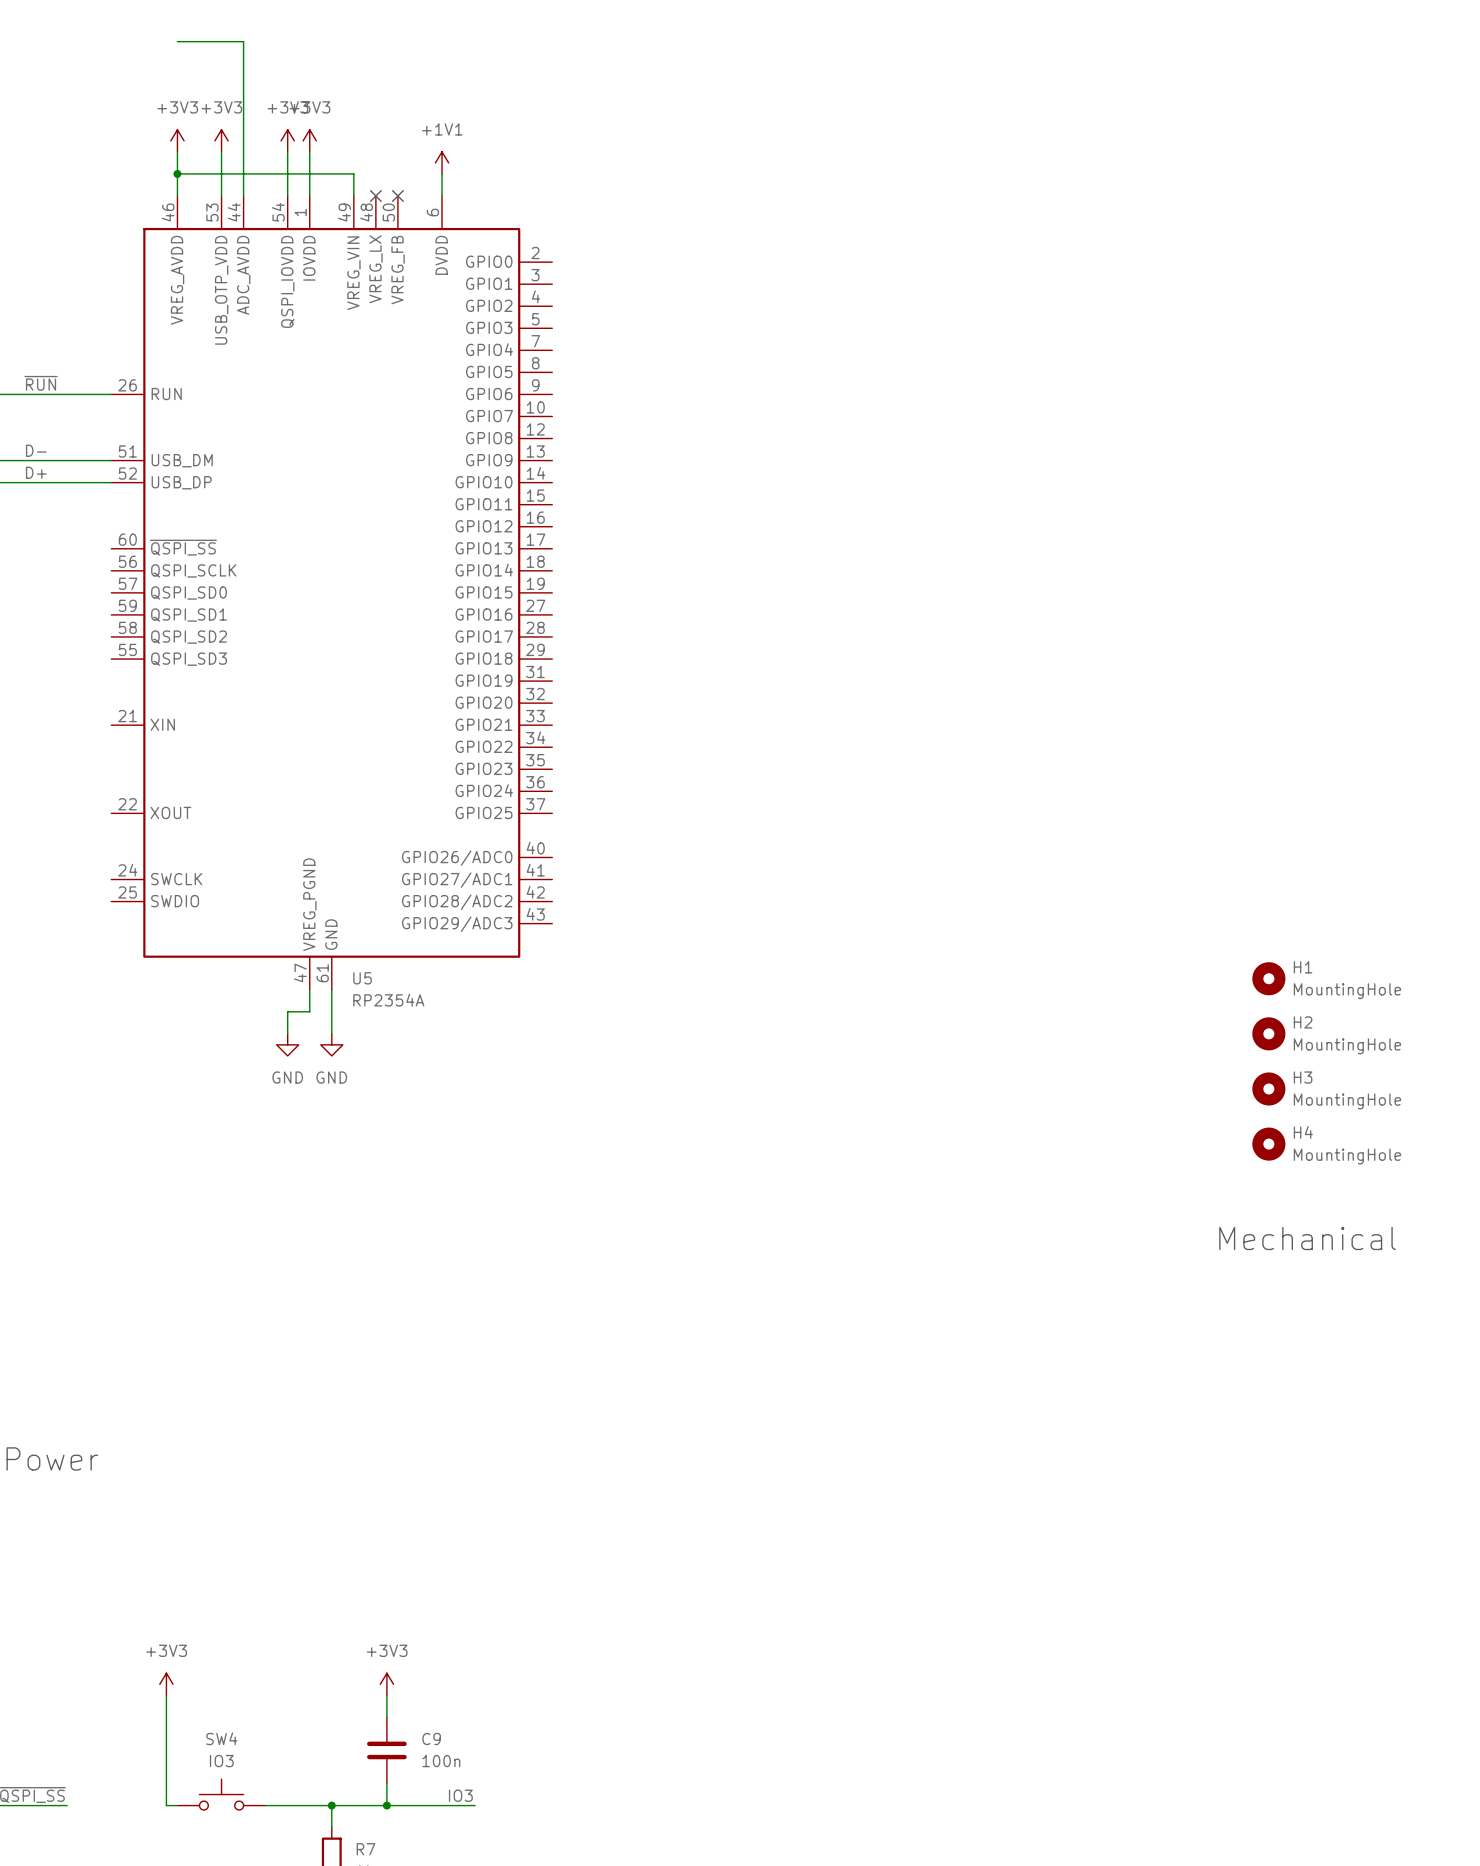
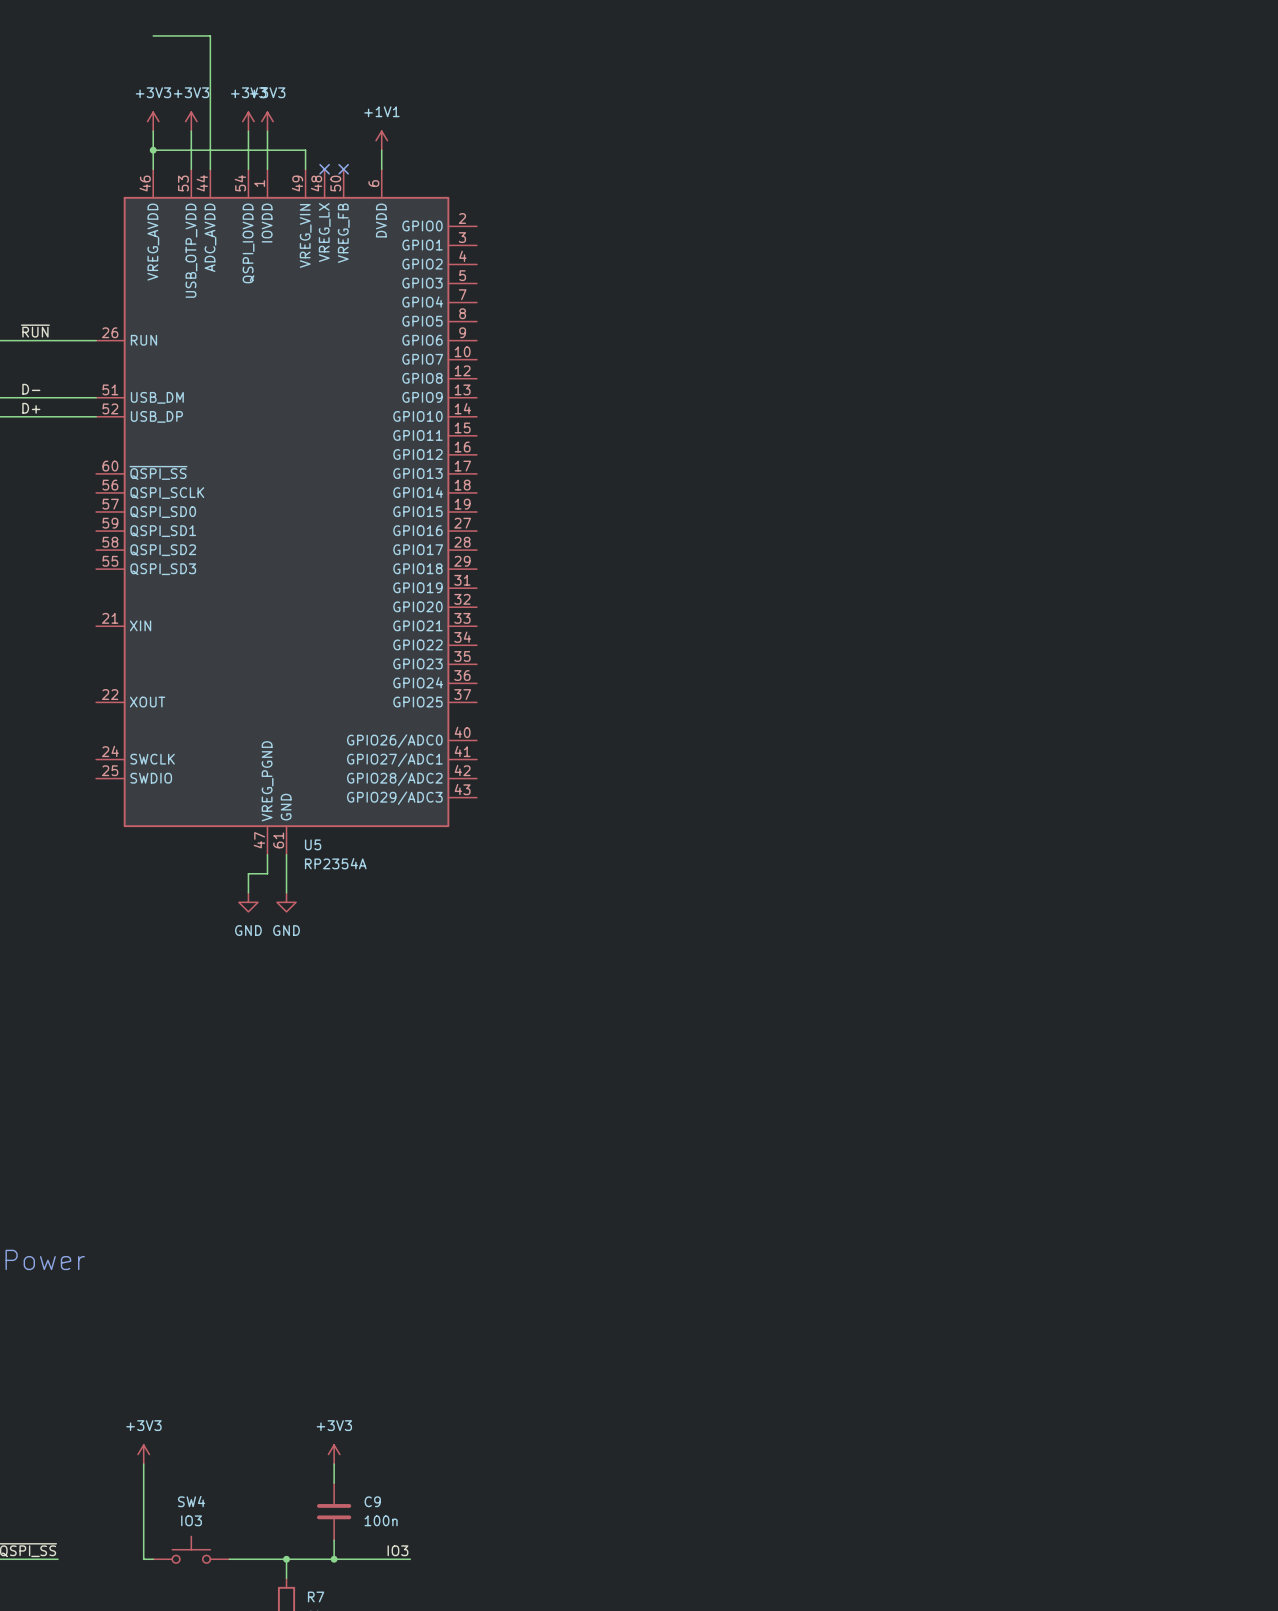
H1: MountingHole (1268, 978) -> none
H2: MountingHole (1268, 1033) -> none
H3: MountingHole (1268, 1088) -> none
H4: MountingHole (1268, 1144) -> none
text: Mechanical (1307, 1238) -> none

